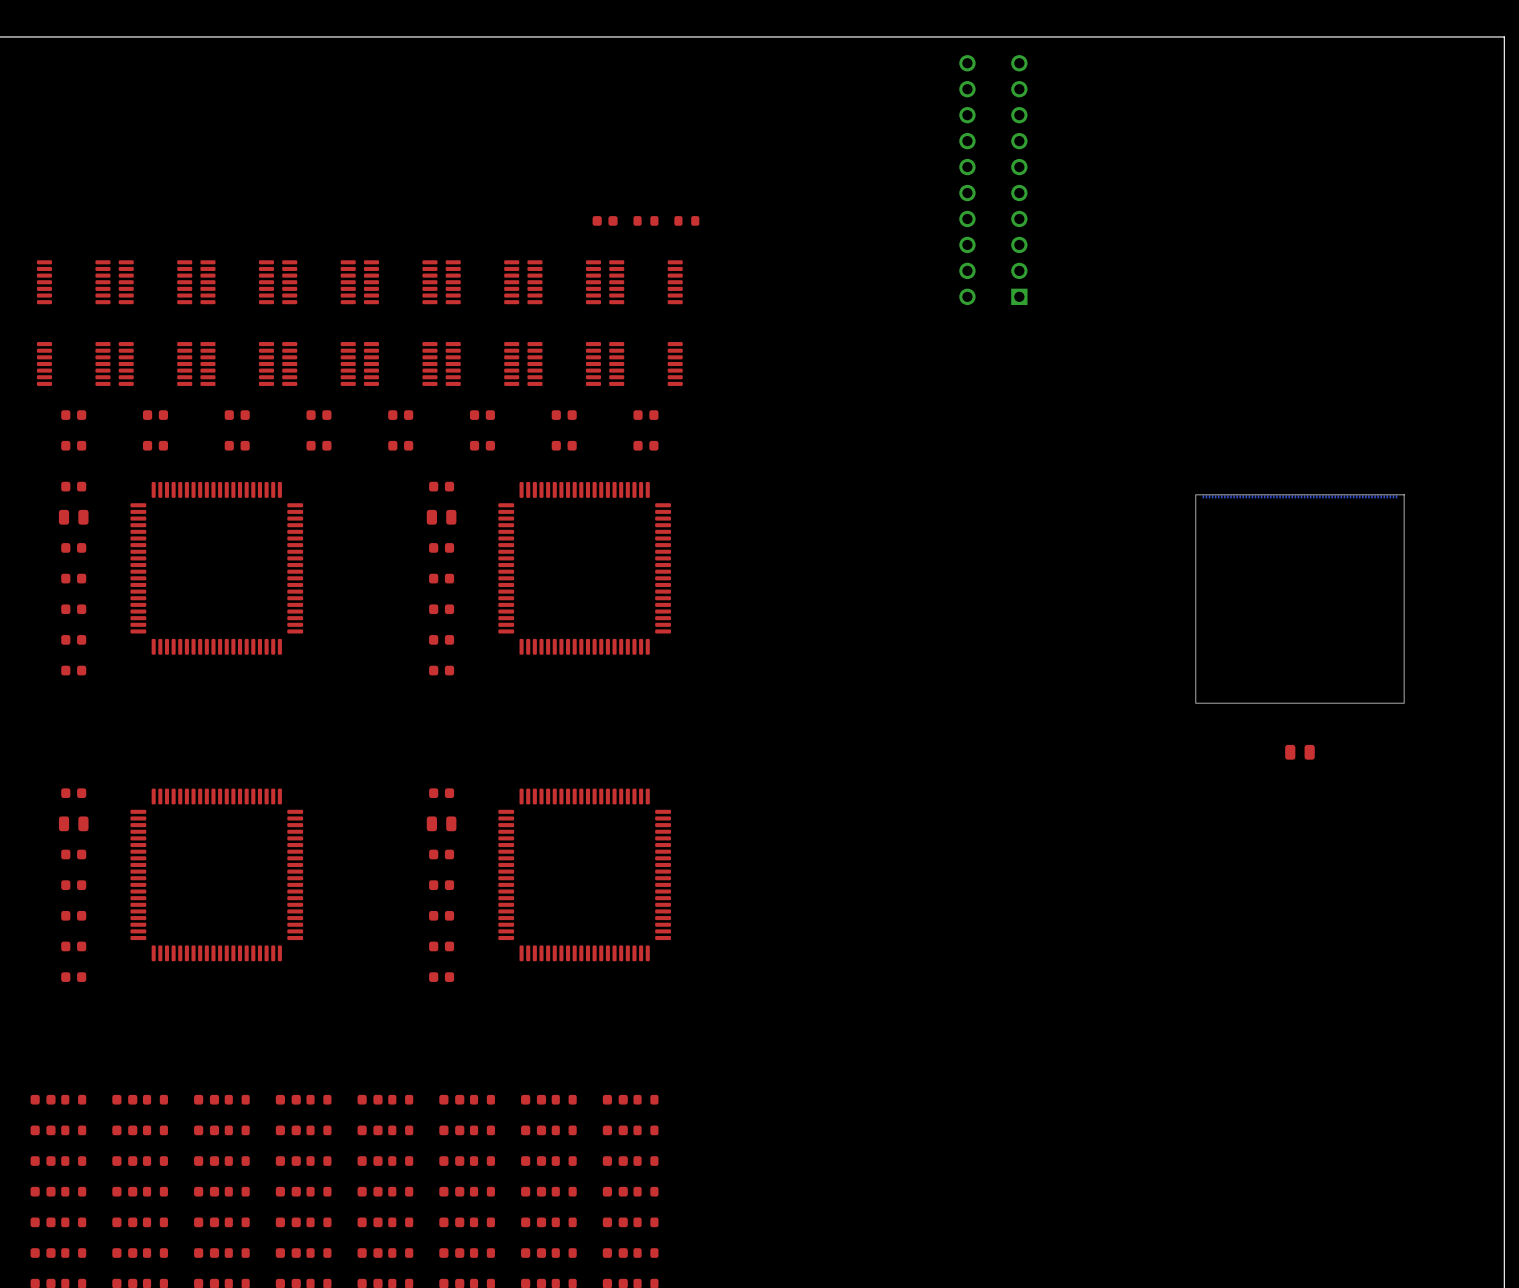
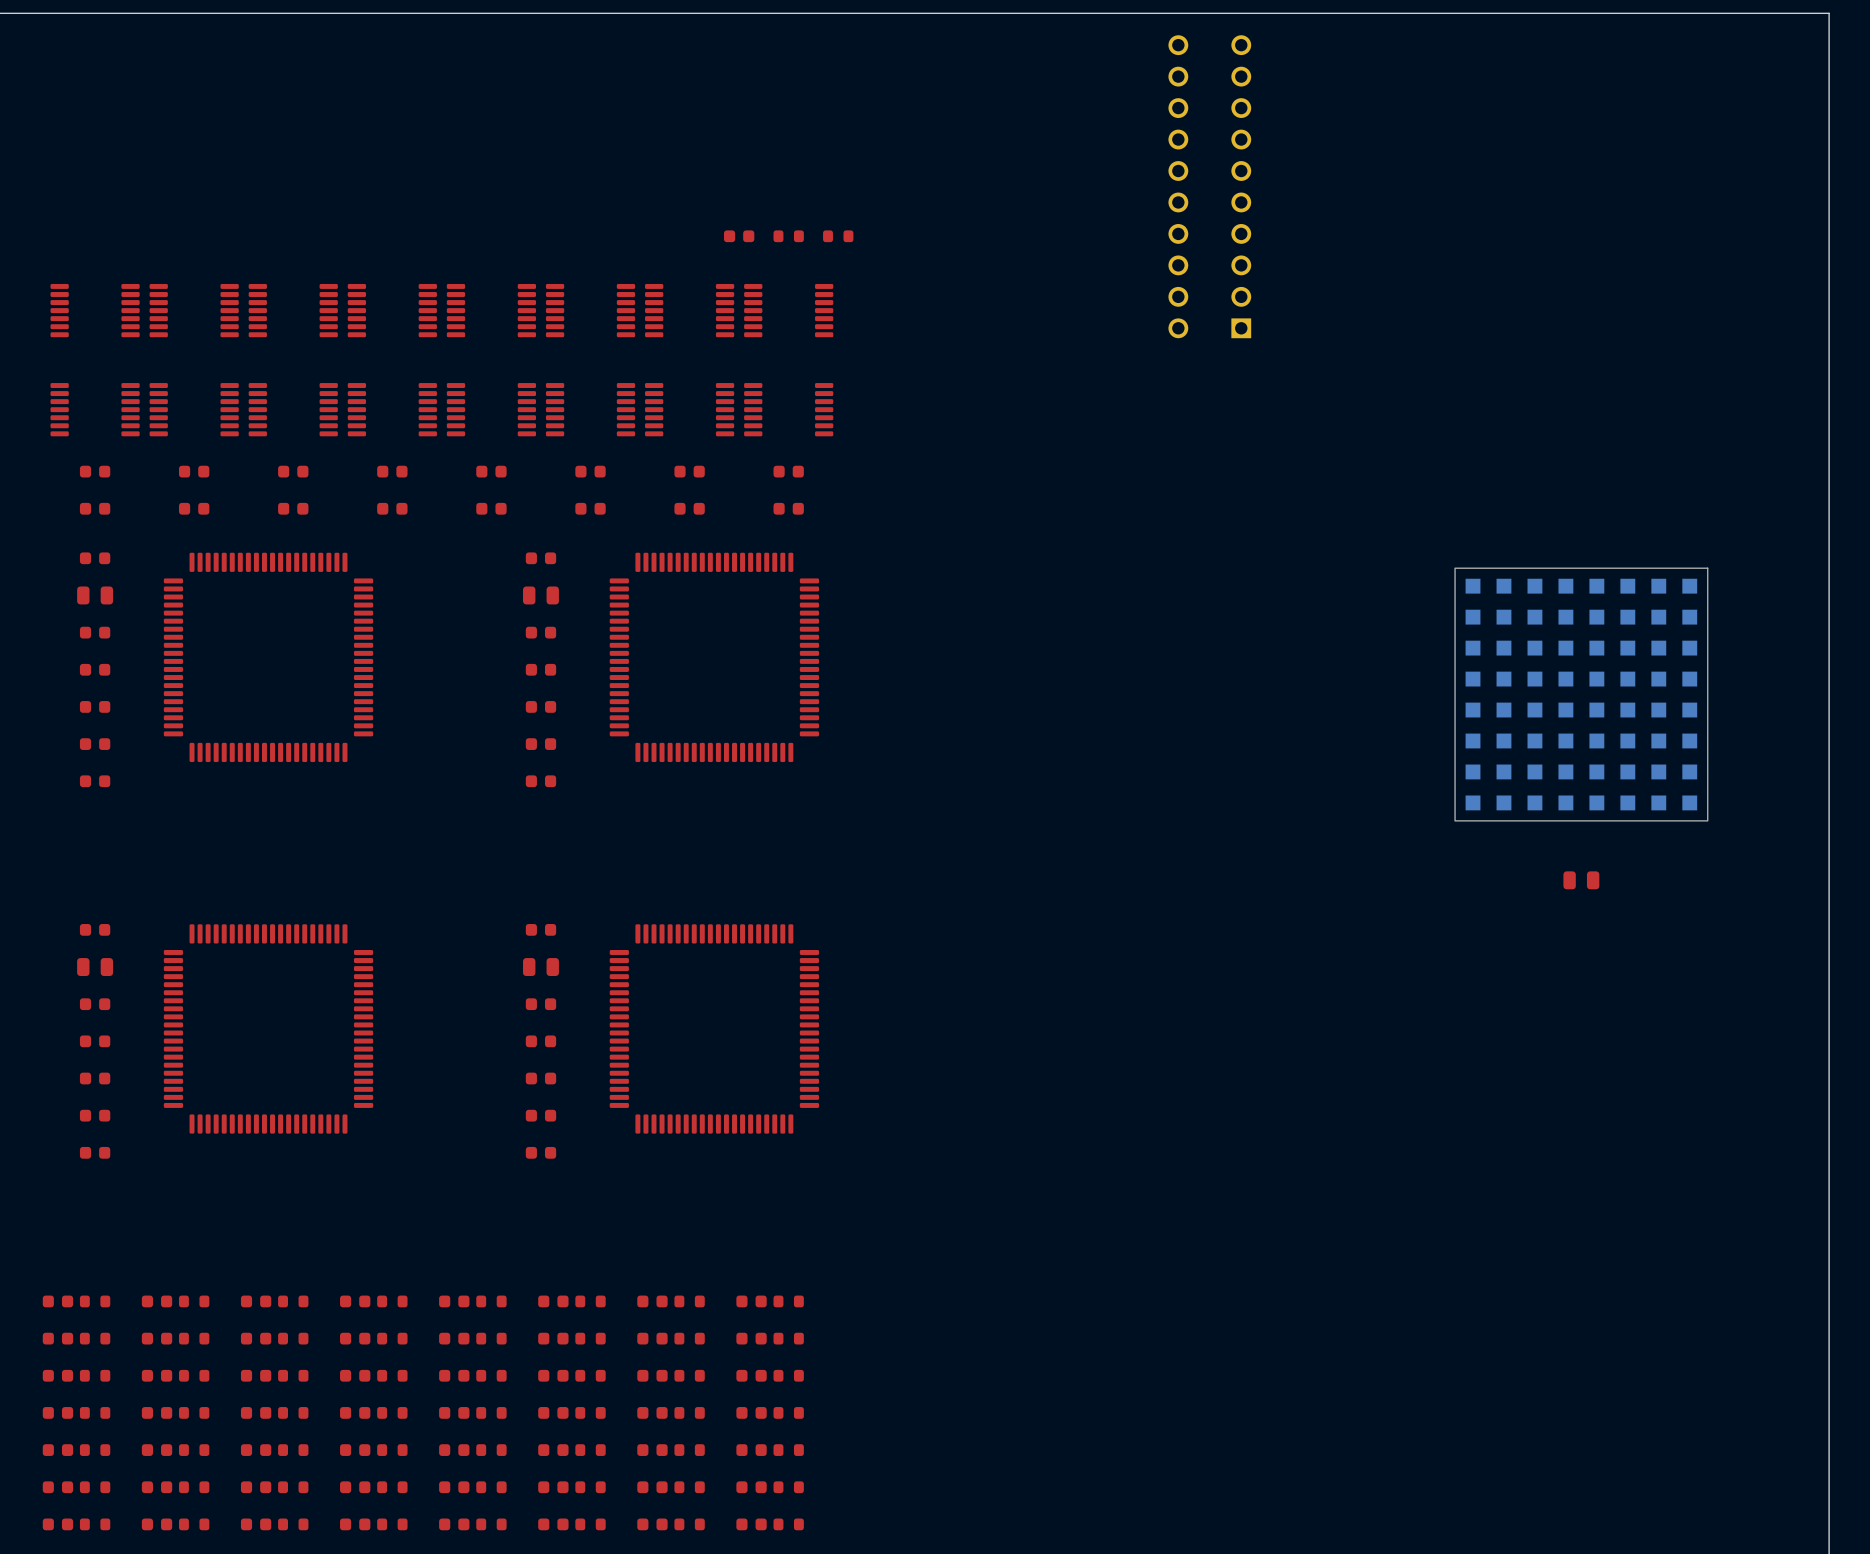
part footprint: [1195, 494, 1405, 704] -> [1454, 567, 1709, 822]

